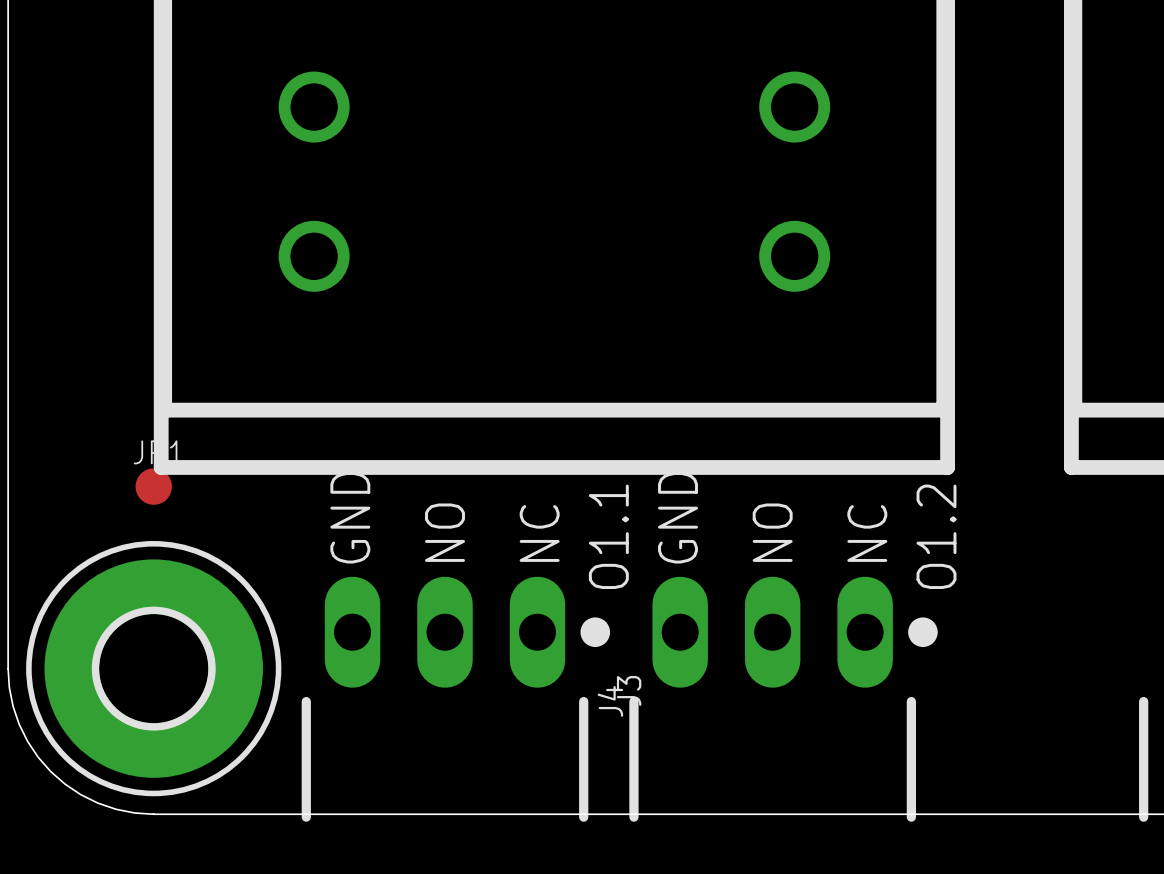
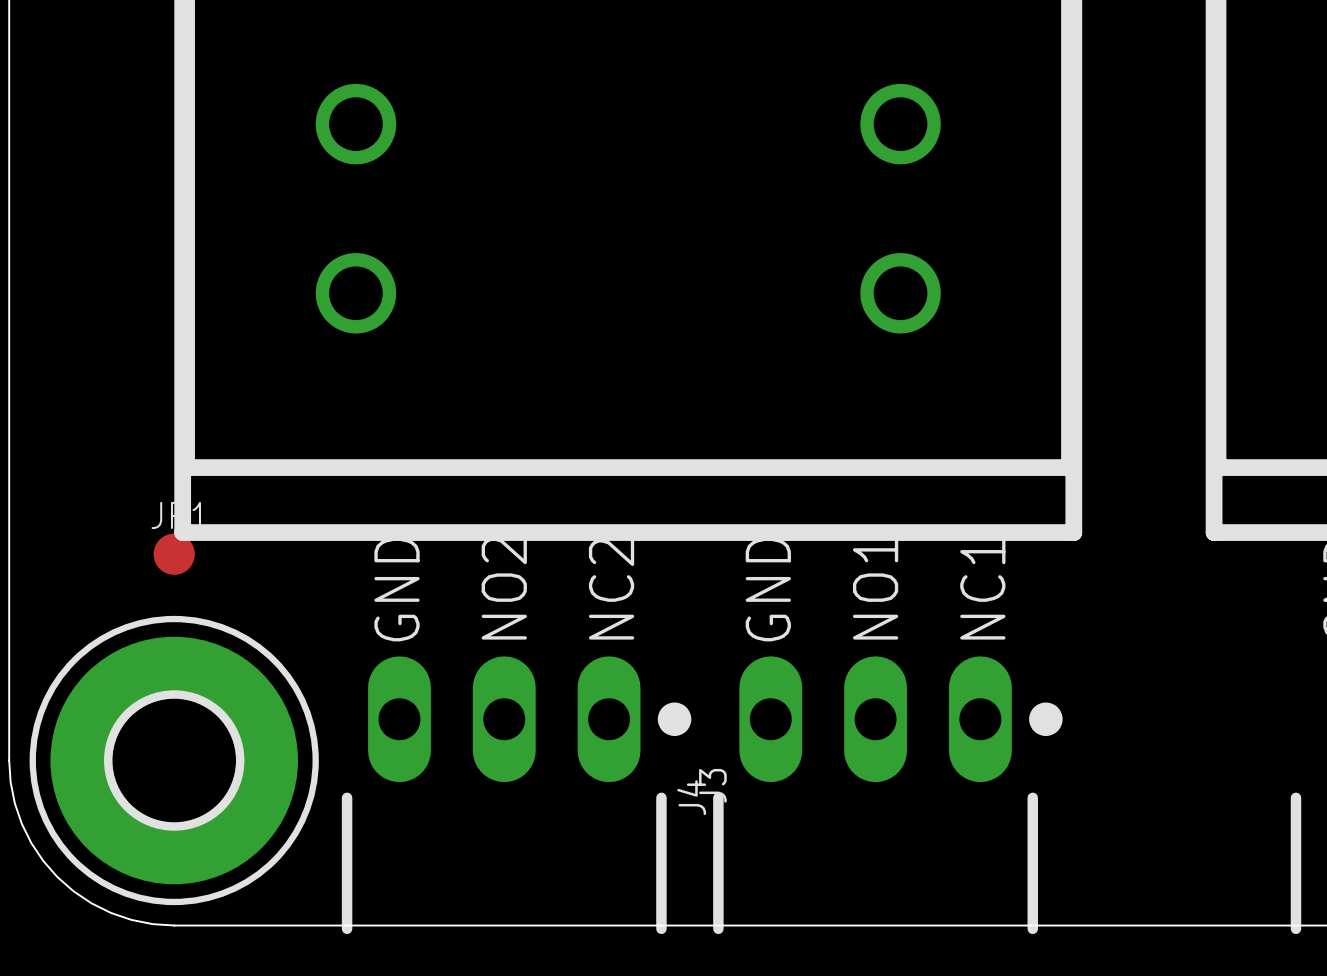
text: NO (445, 532) -> NO2 (504, 588)
text: NO (772, 532) -> NO1 (875, 588)
text: NC (539, 533) -> NC2 (611, 589)
text: NC (867, 533) -> NC1 (982, 589)
text: O1.1 (608, 536) -> none
text: O1.2 (936, 536) -> none

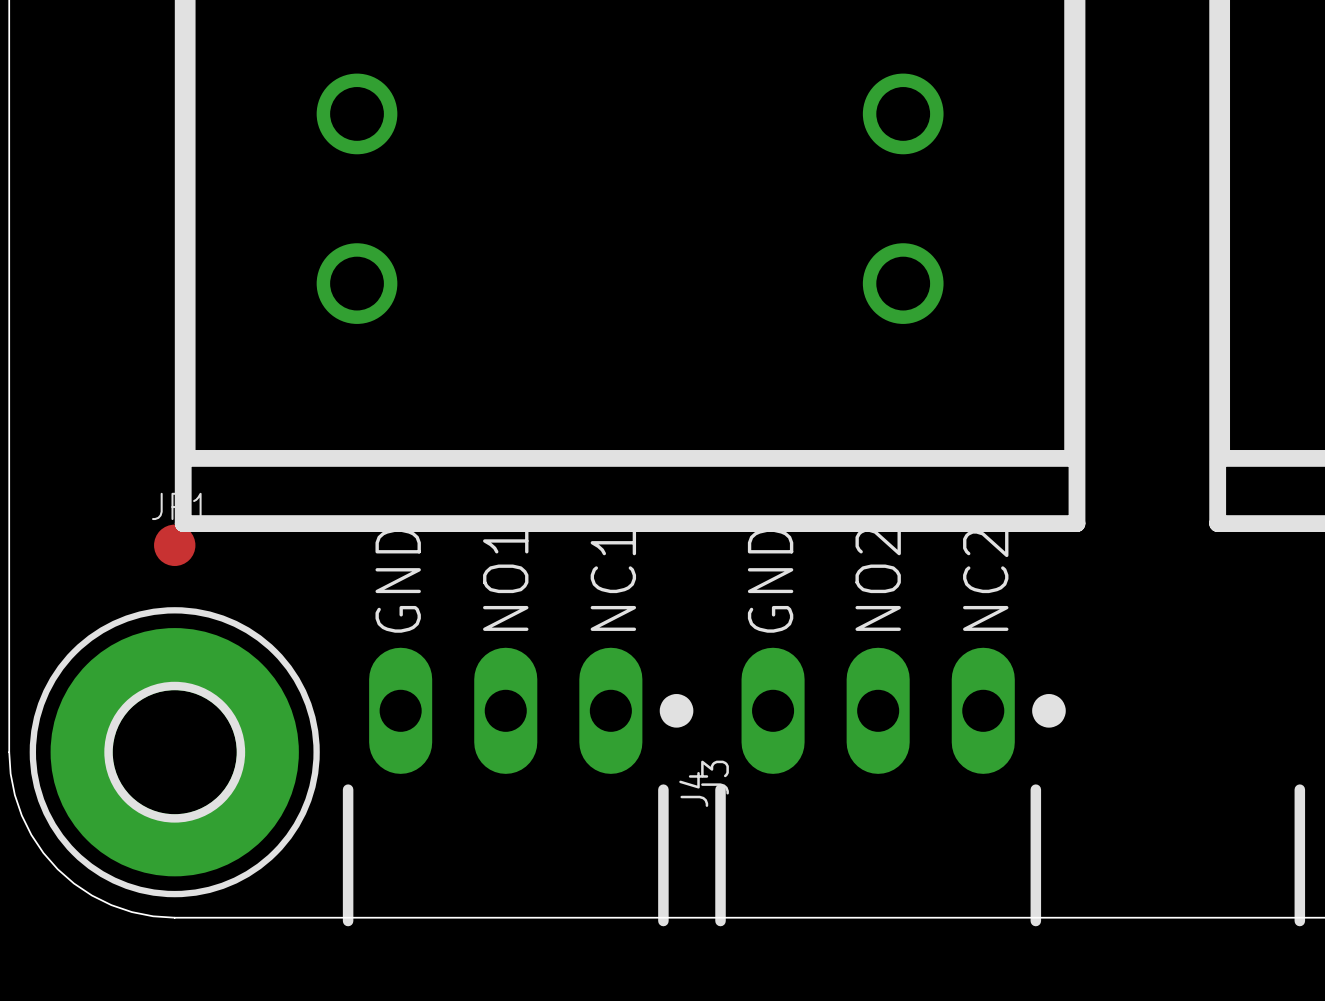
text: NO2 (504, 588) -> NO1 (505, 579)
text: NO1 (875, 588) -> NO2 (878, 579)
text: NC2 (611, 589) -> NC1 (613, 580)
text: NC1 (982, 589) -> NC2 (985, 580)

